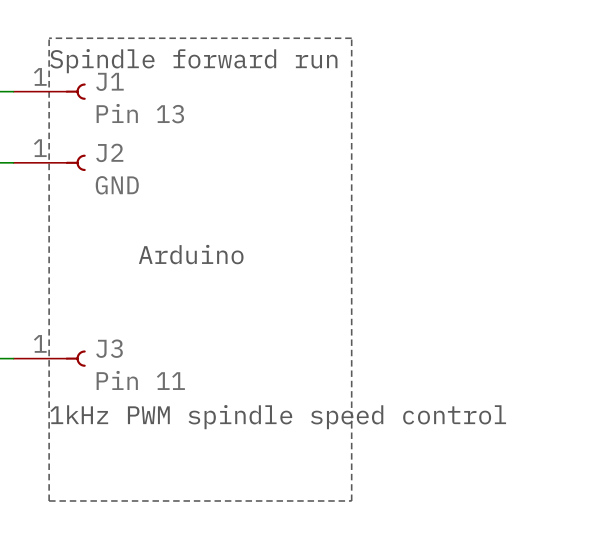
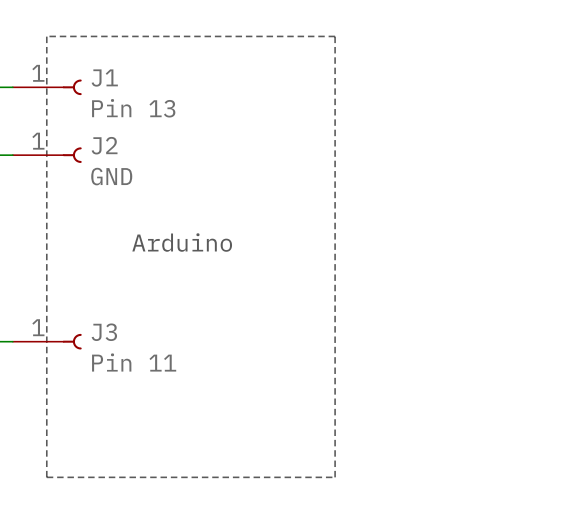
text: Spindle forward run (193, 61) -> none
text: 1kHz PWM spindle speed control (278, 417) -> none

